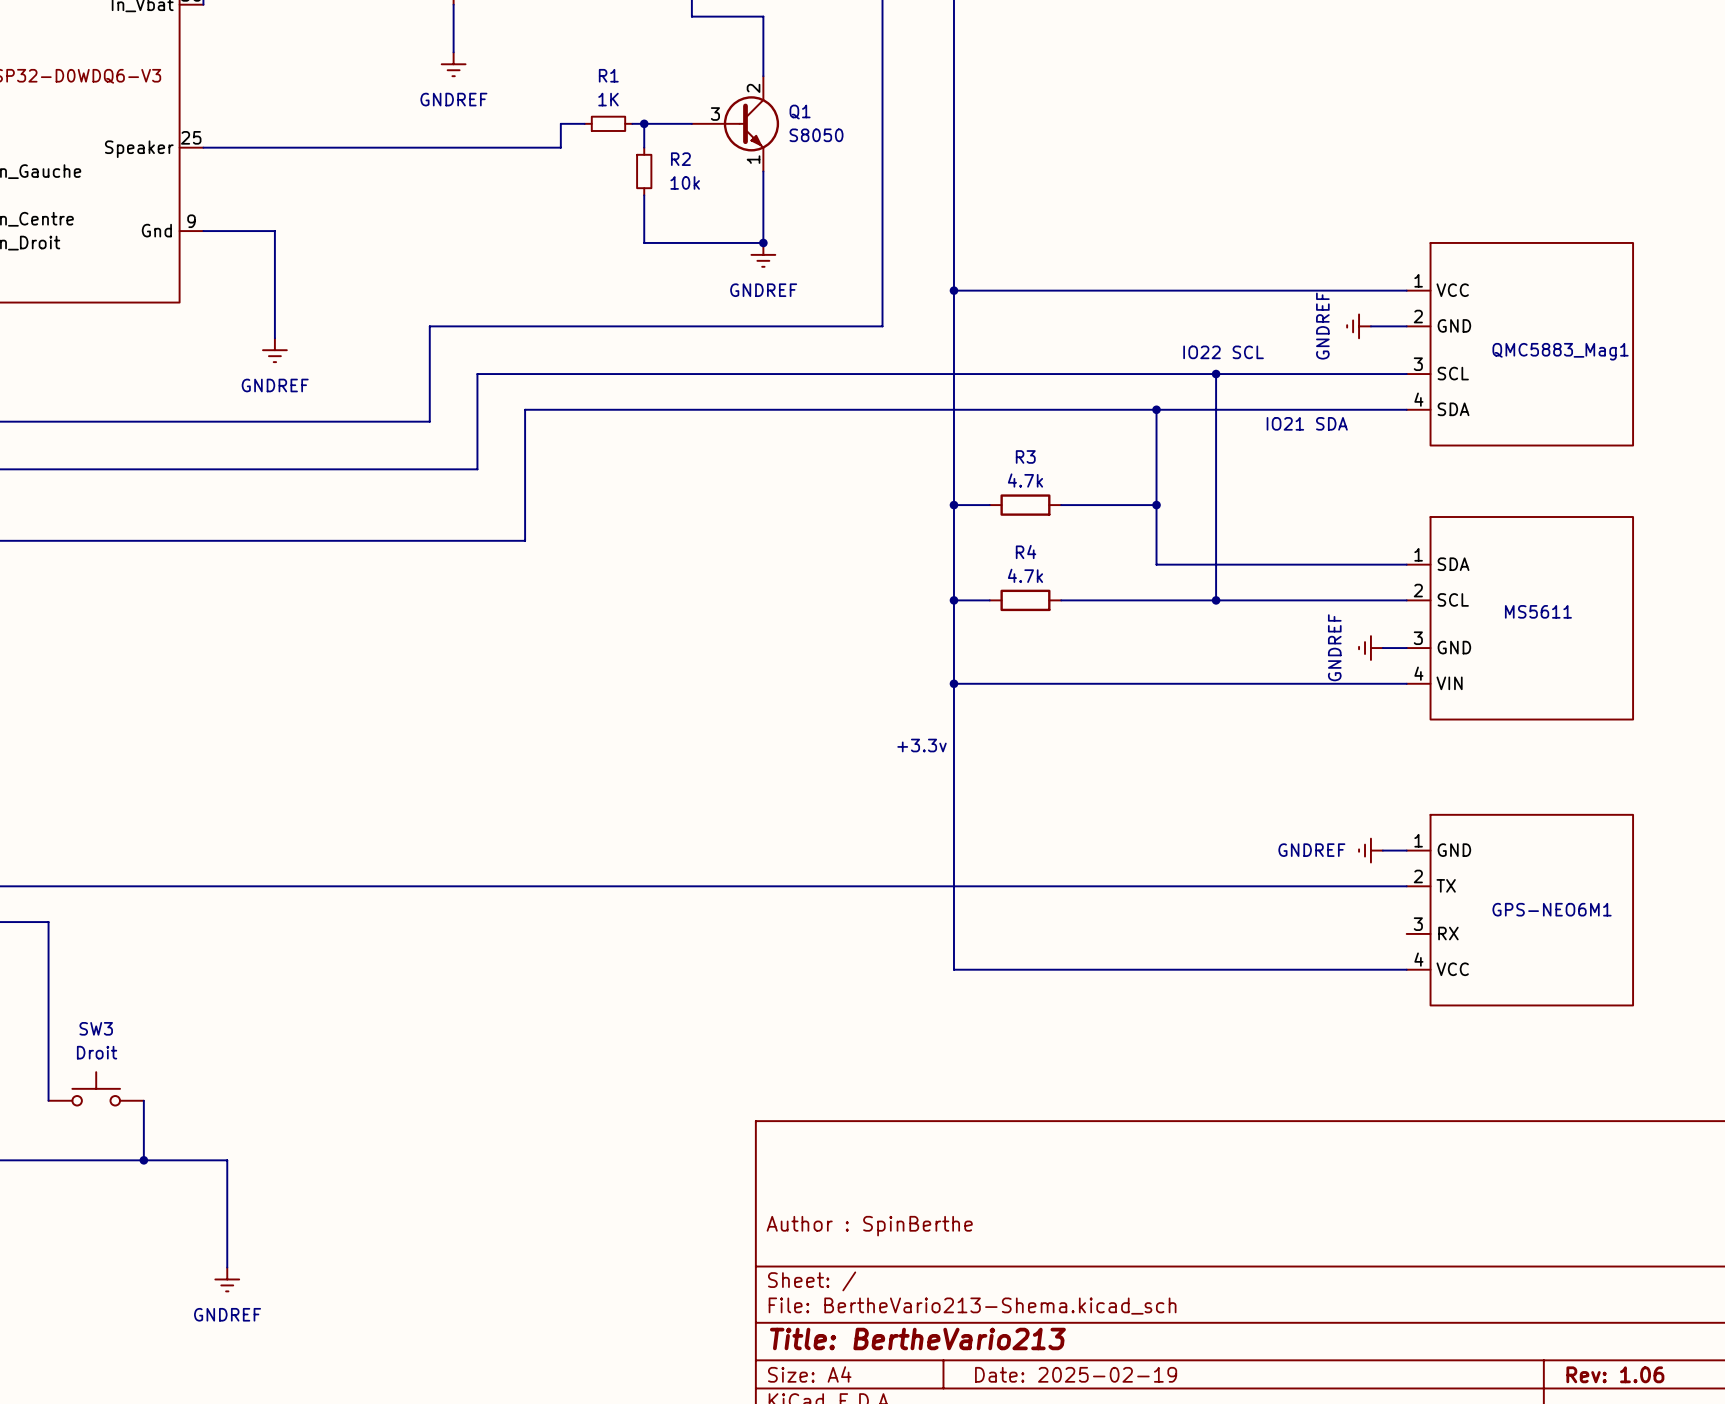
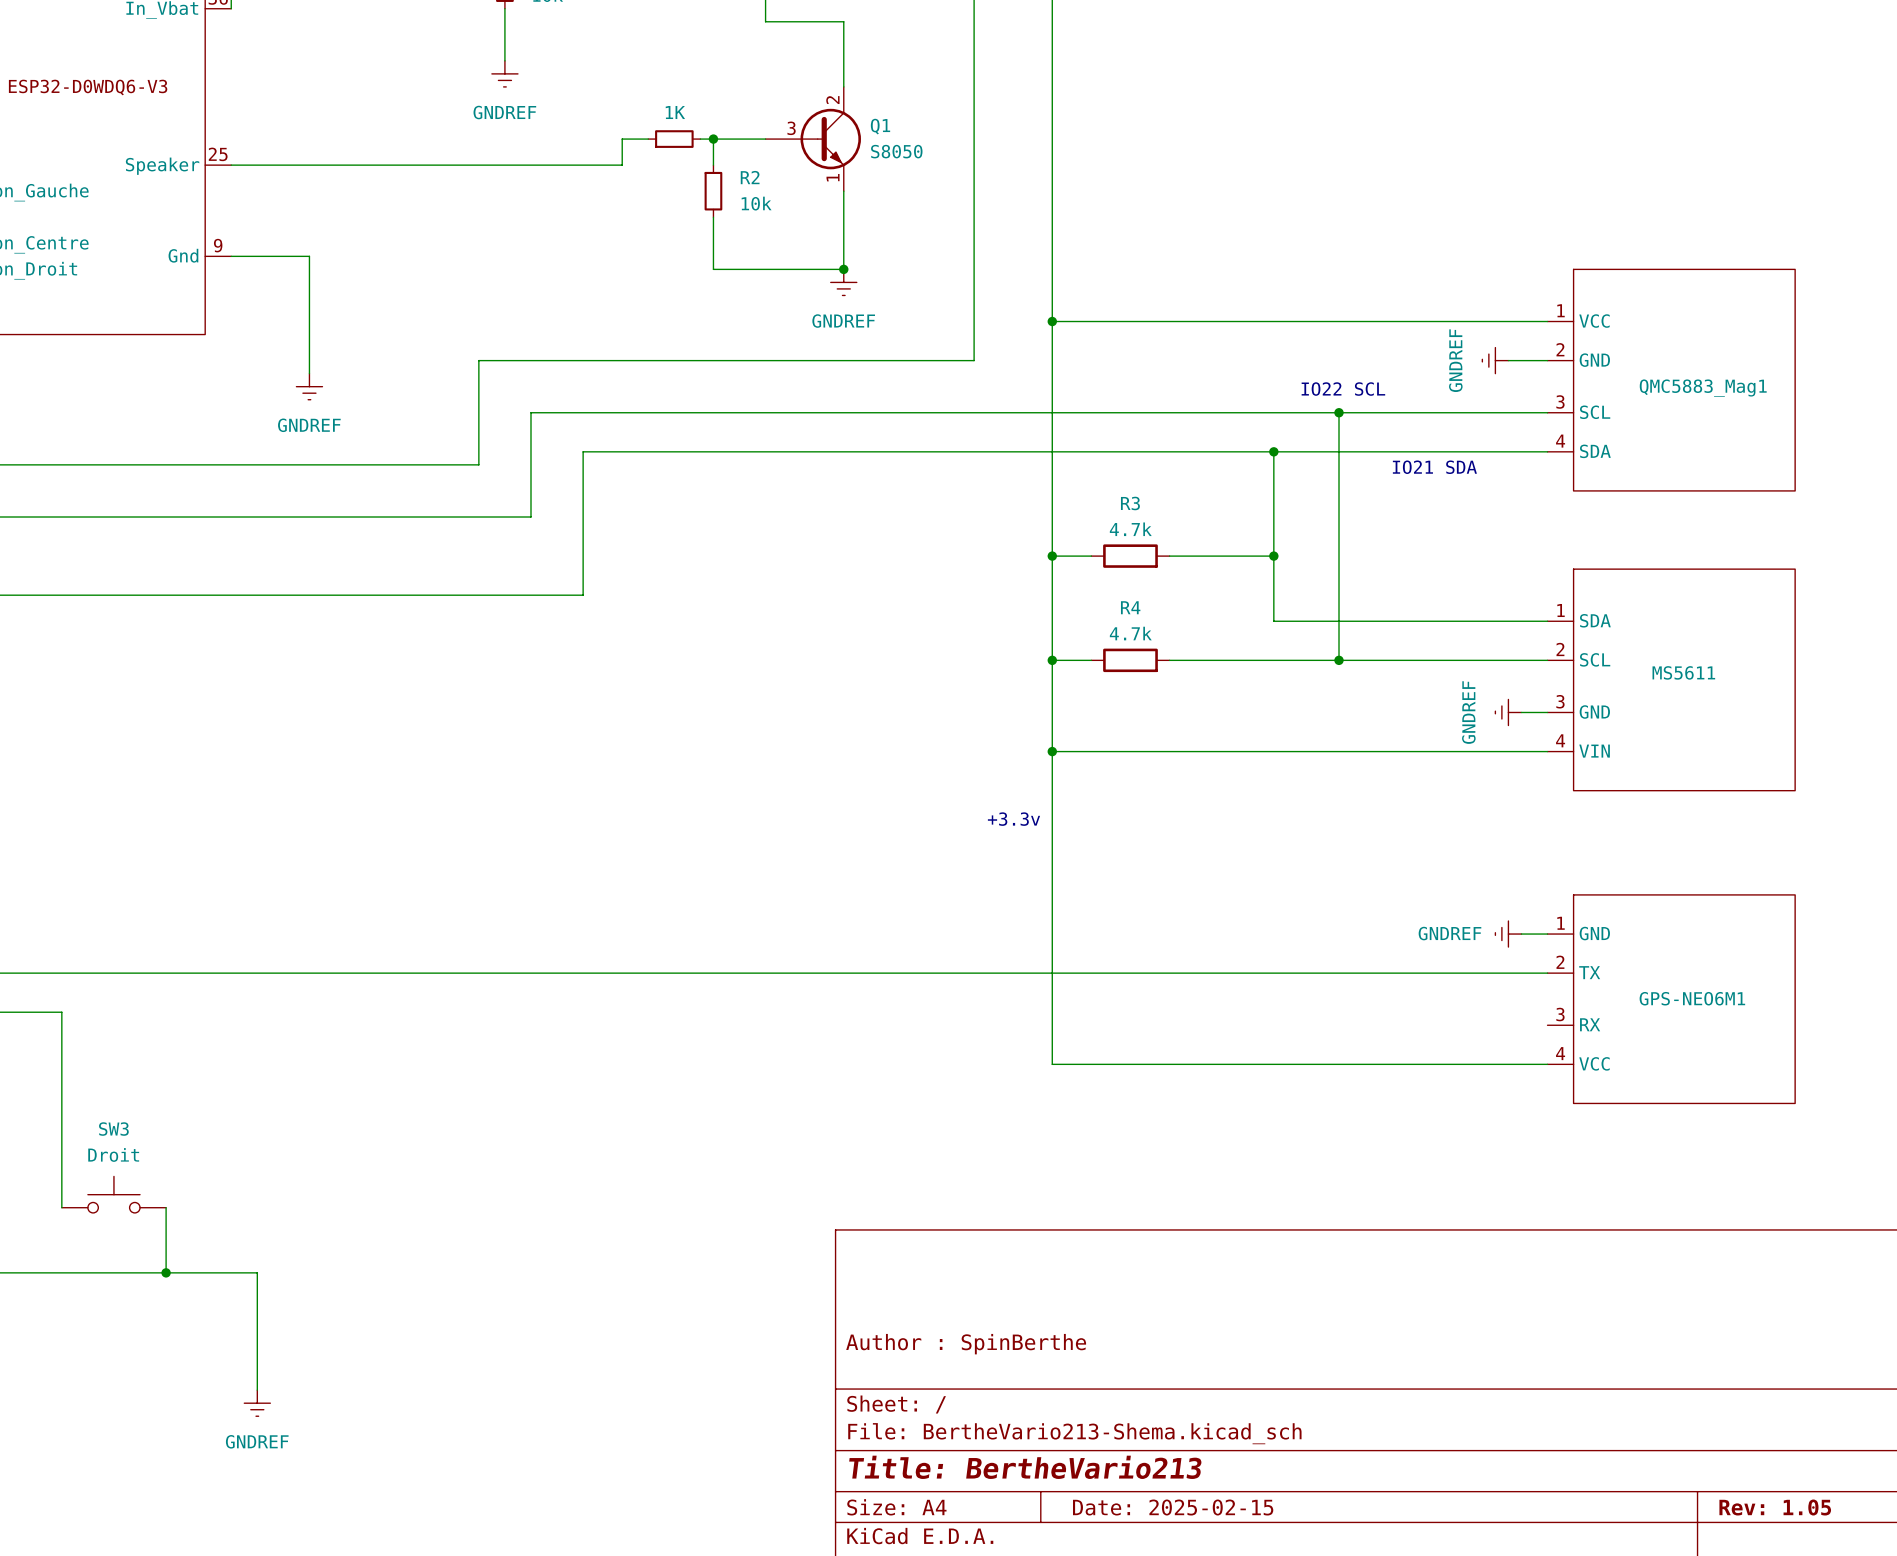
R1 name: R1 (608, 75) -> none
title block: Date: 2025-02-19 (1076, 1374) -> Date: 2025-02-15 (1173, 1507)
title block: Rev: 1.06 (1615, 1374) -> Rev: 1.05 (1775, 1507)

